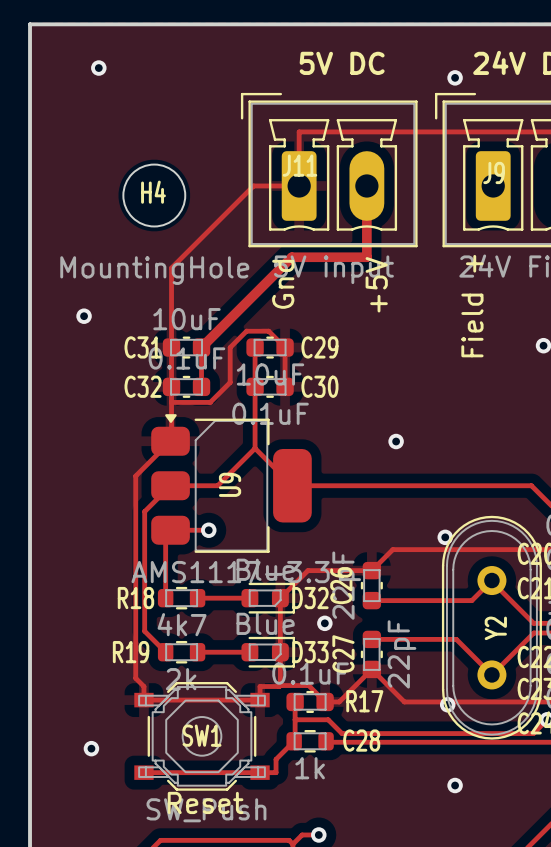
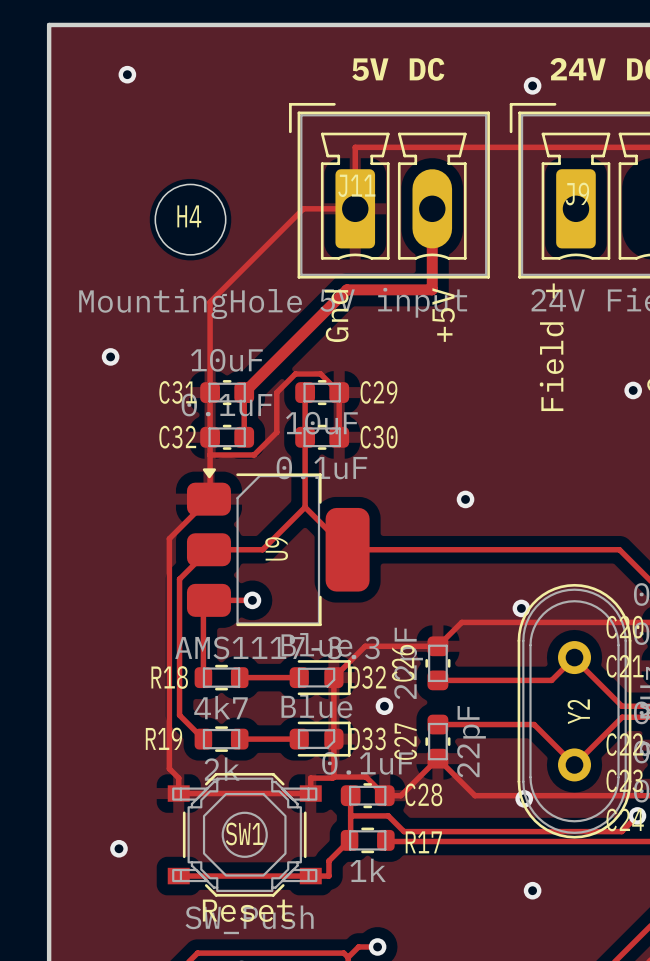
R17 name position: R17 (364, 701) -> R17 (423, 842)
C28 name position: C28 (361, 740) -> C28 (423, 794)

